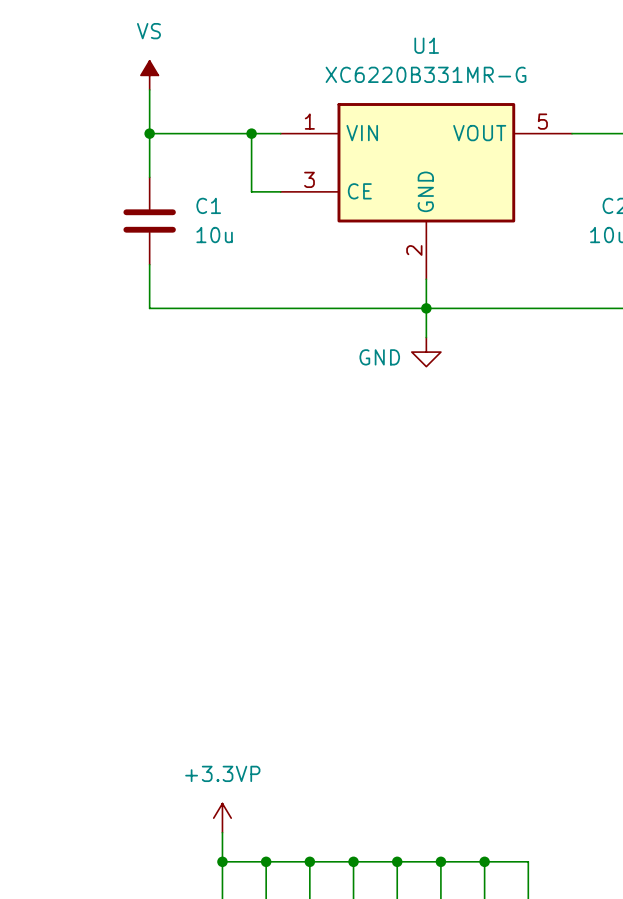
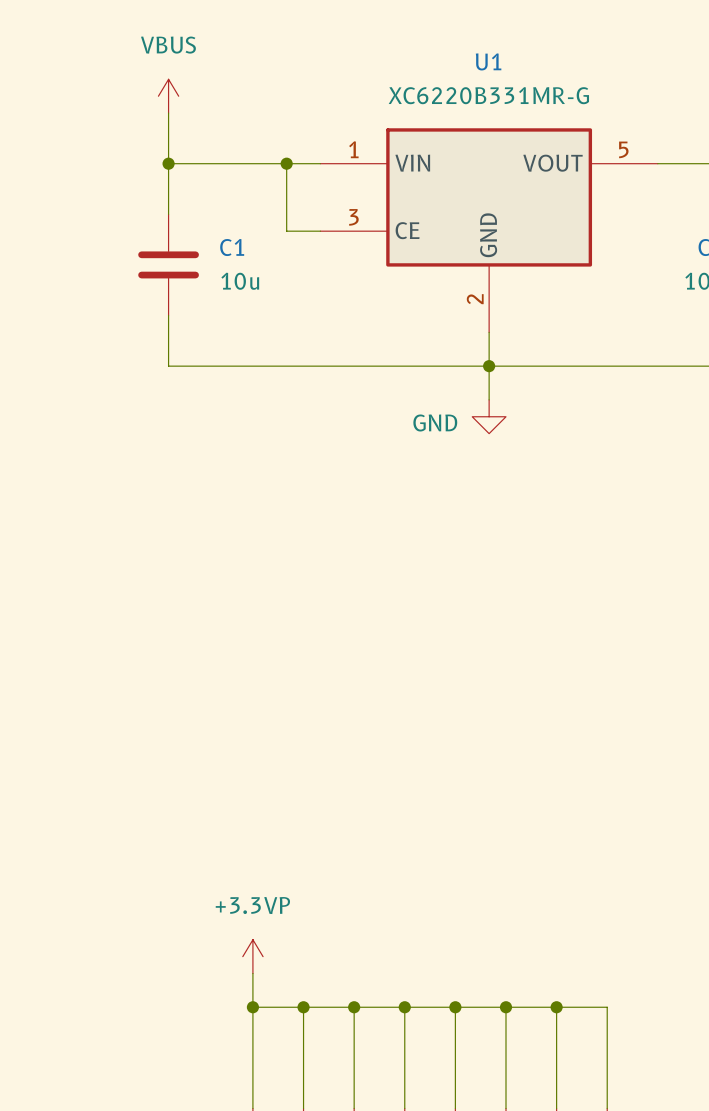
power symbol: VS (149, 75) -> VBUS (168, 96)

